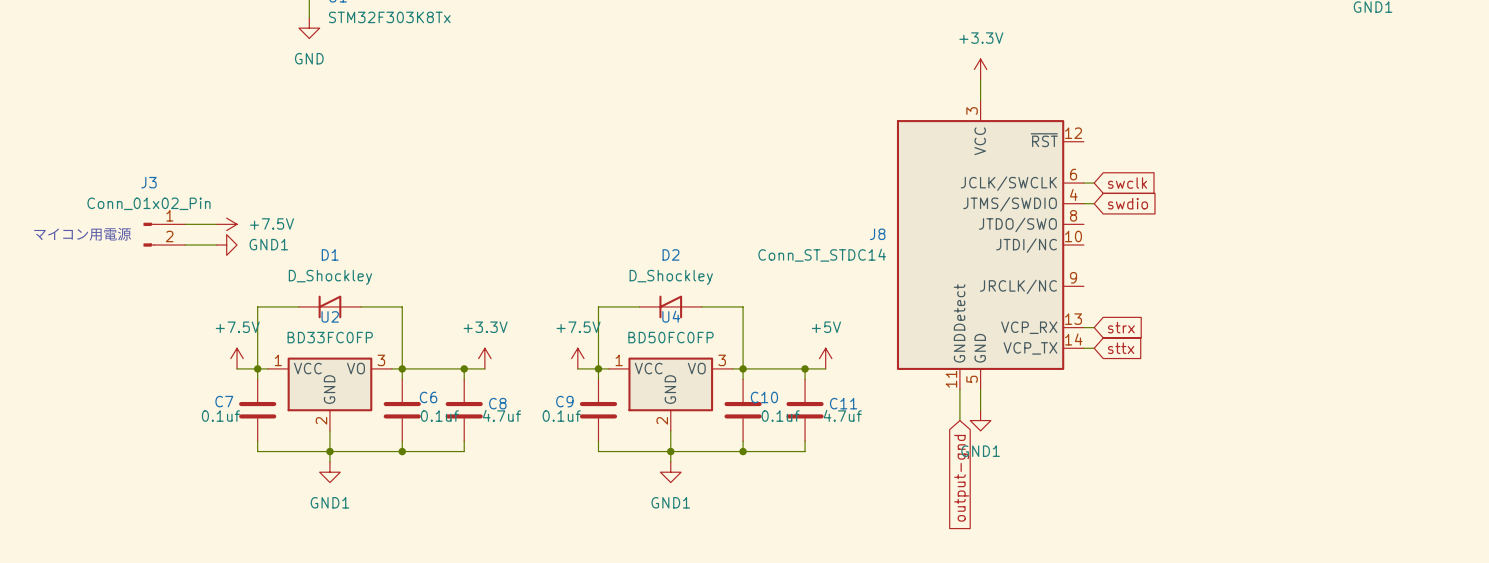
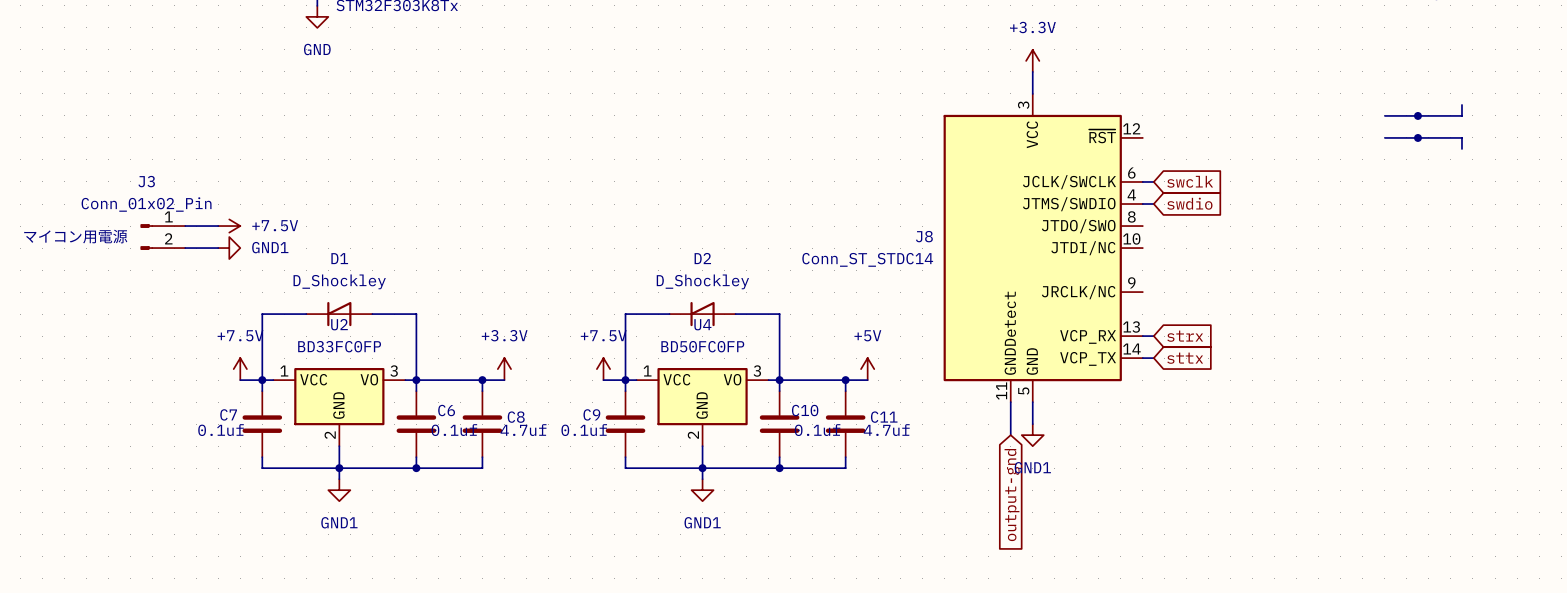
wire: none -> (1461, 104) (1461, 115) (1384, 115)
junction: none -> (1417, 115)
wire: none -> (1384, 137) (1461, 137) (1461, 148)
junction: none -> (1417, 137)

